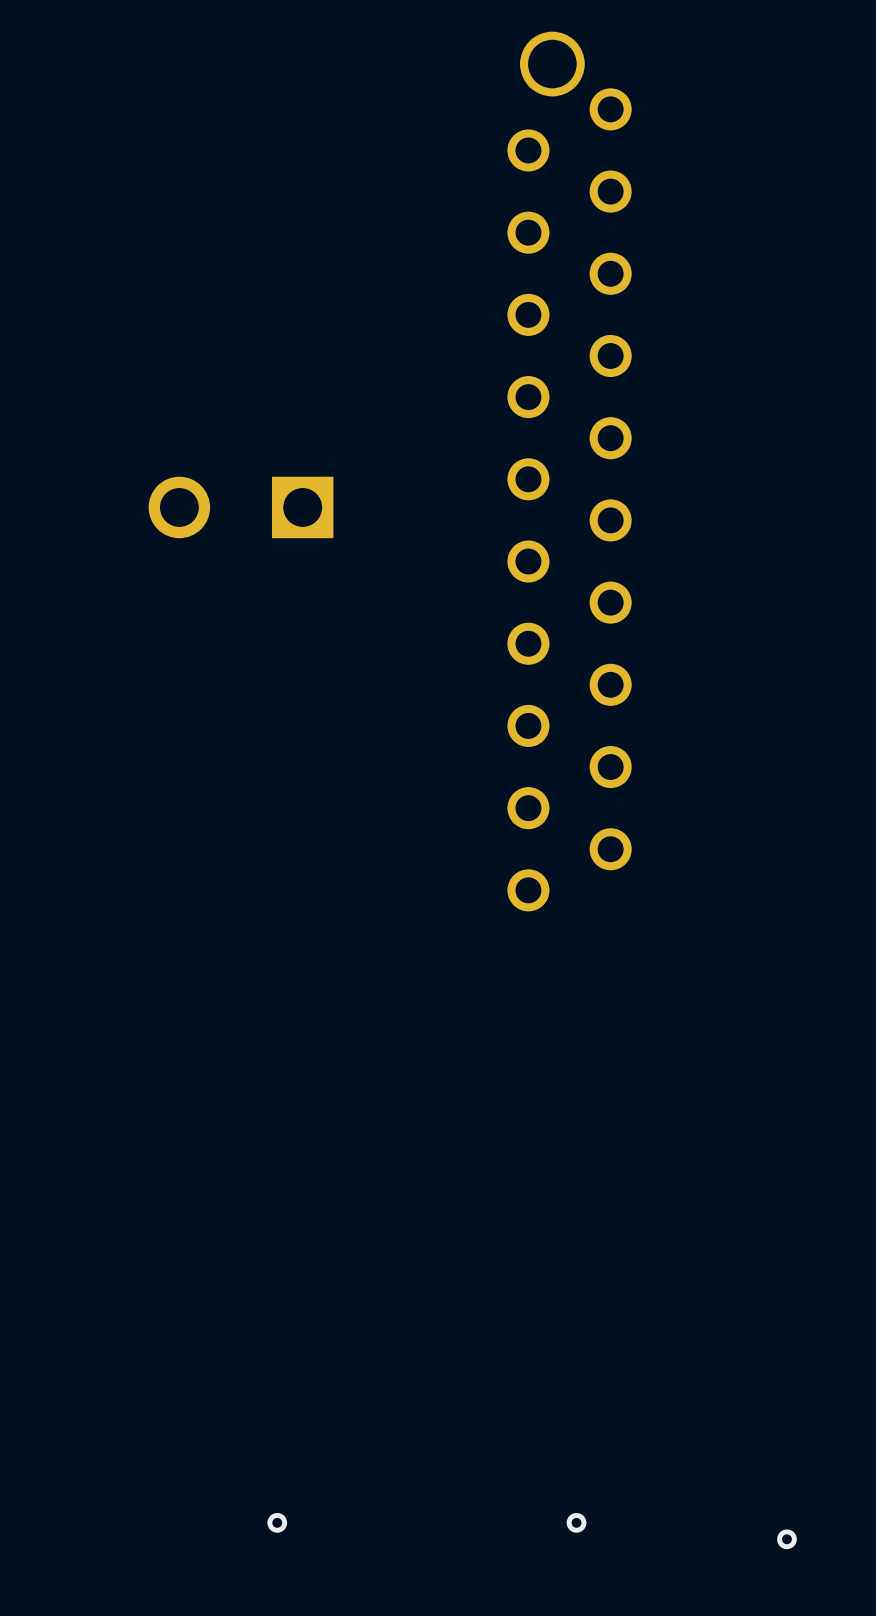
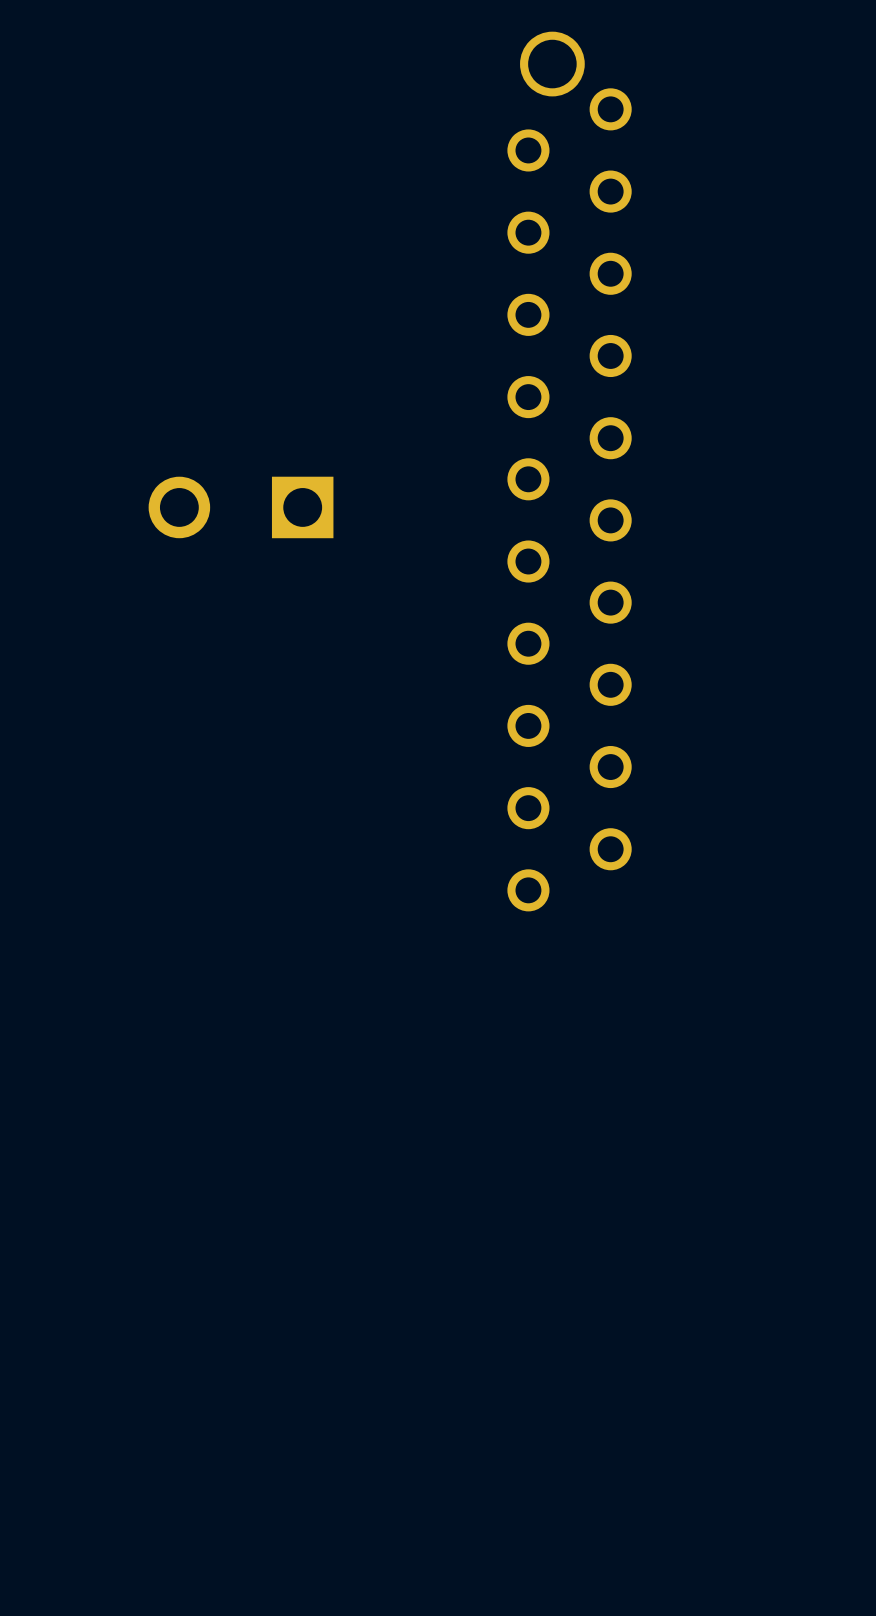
via: (277, 1522) -> none
via: (576, 1522) -> none
via: (786, 1539) -> none

